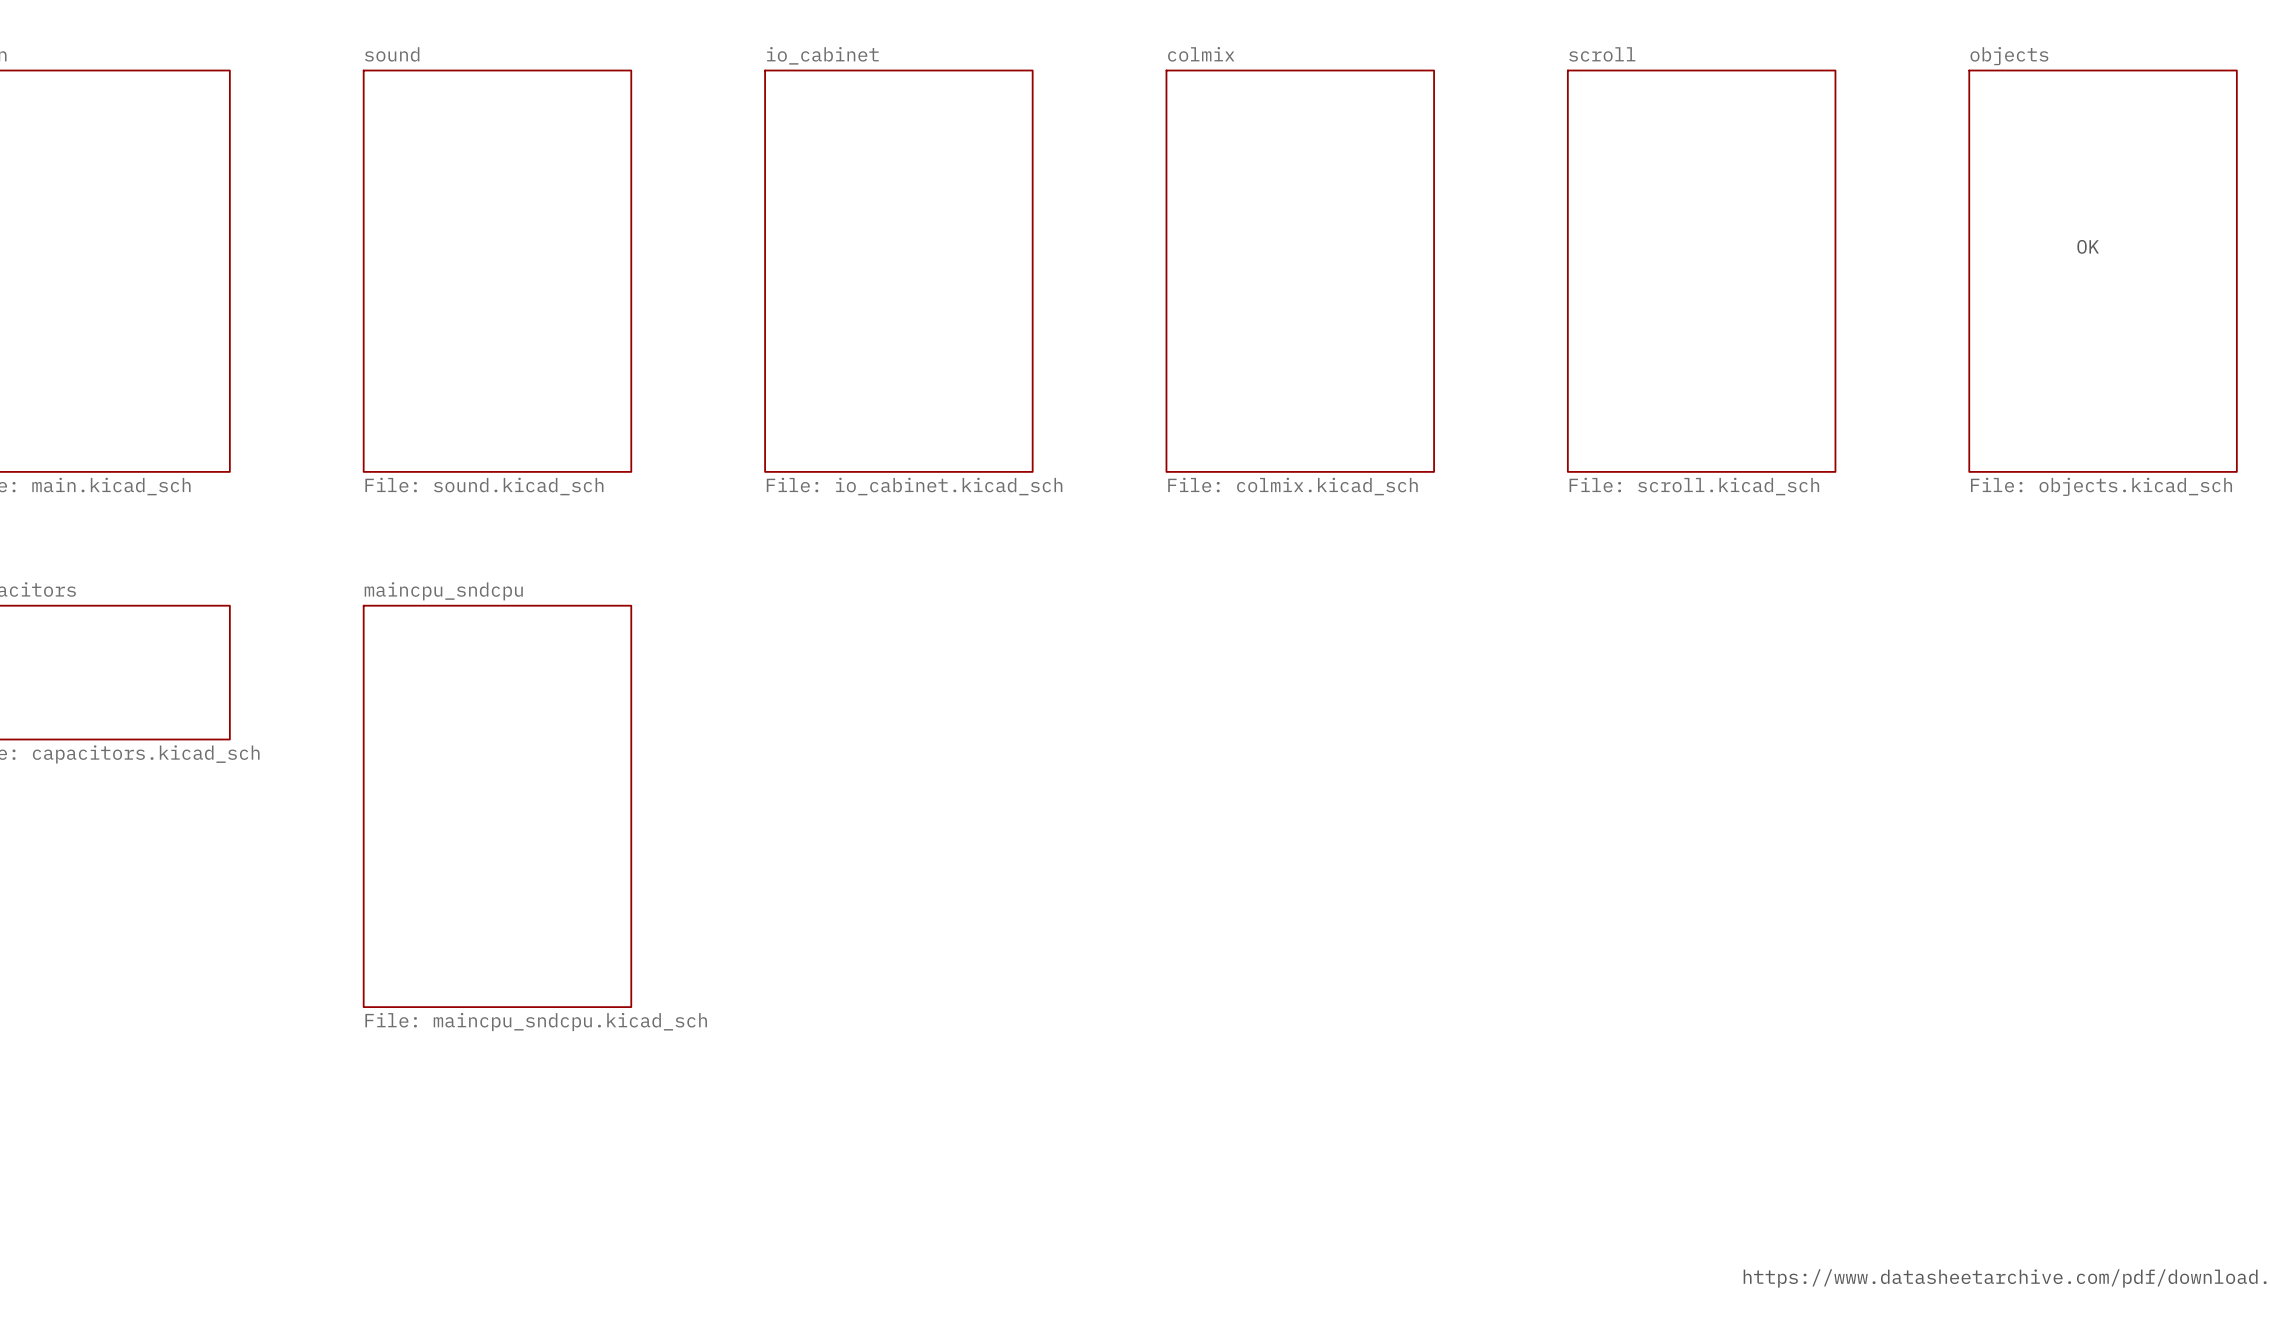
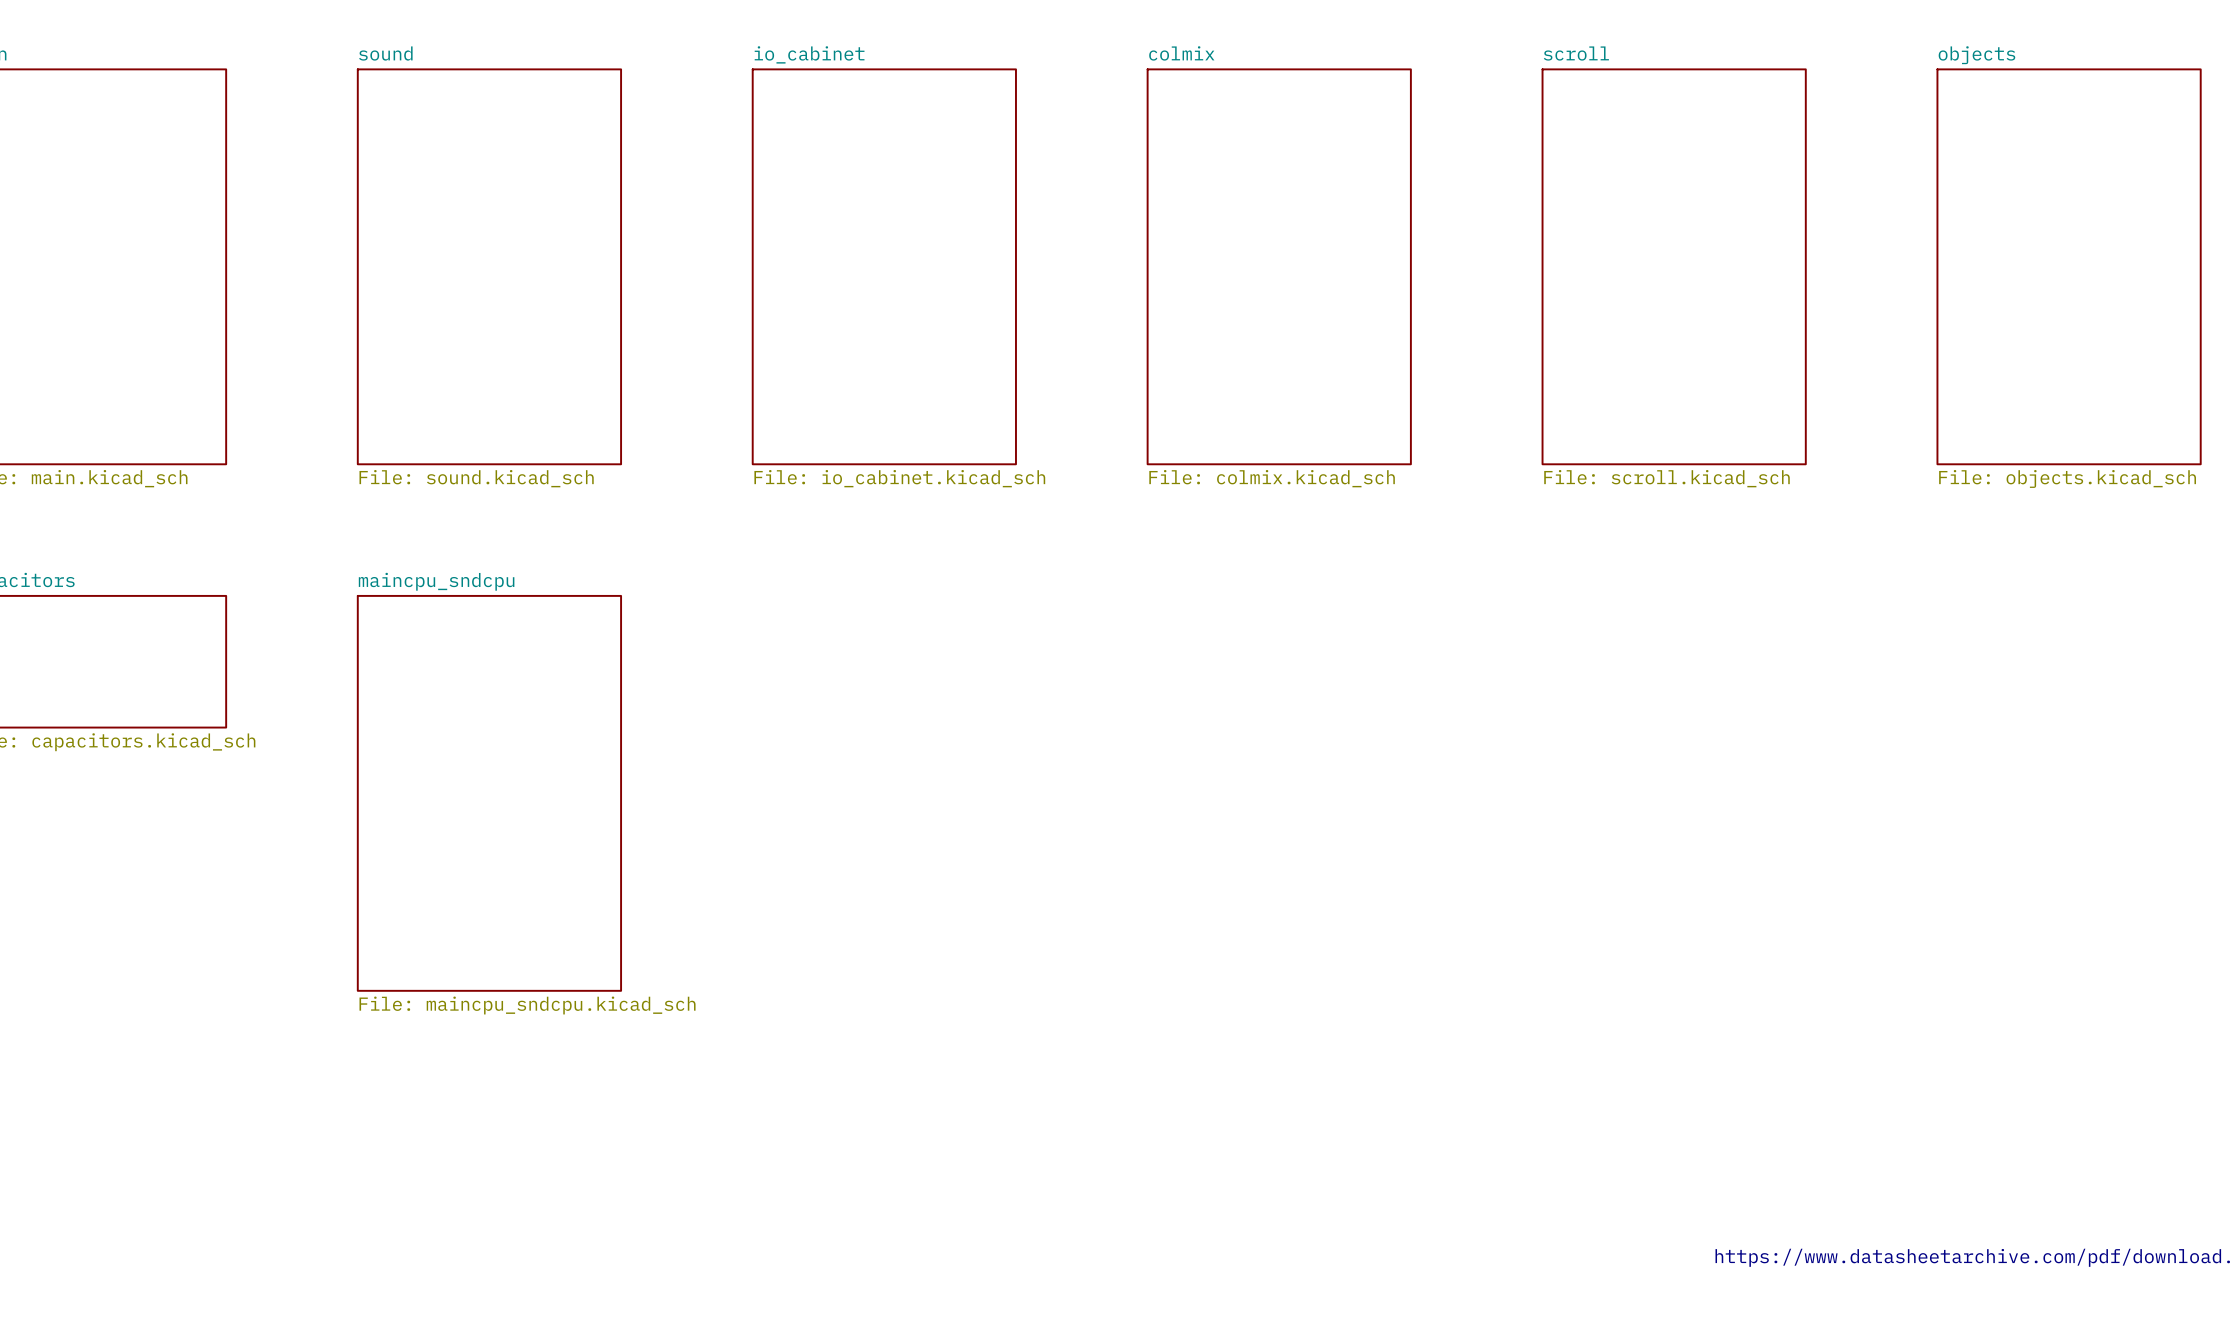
text: OK (2088, 246) -> none

